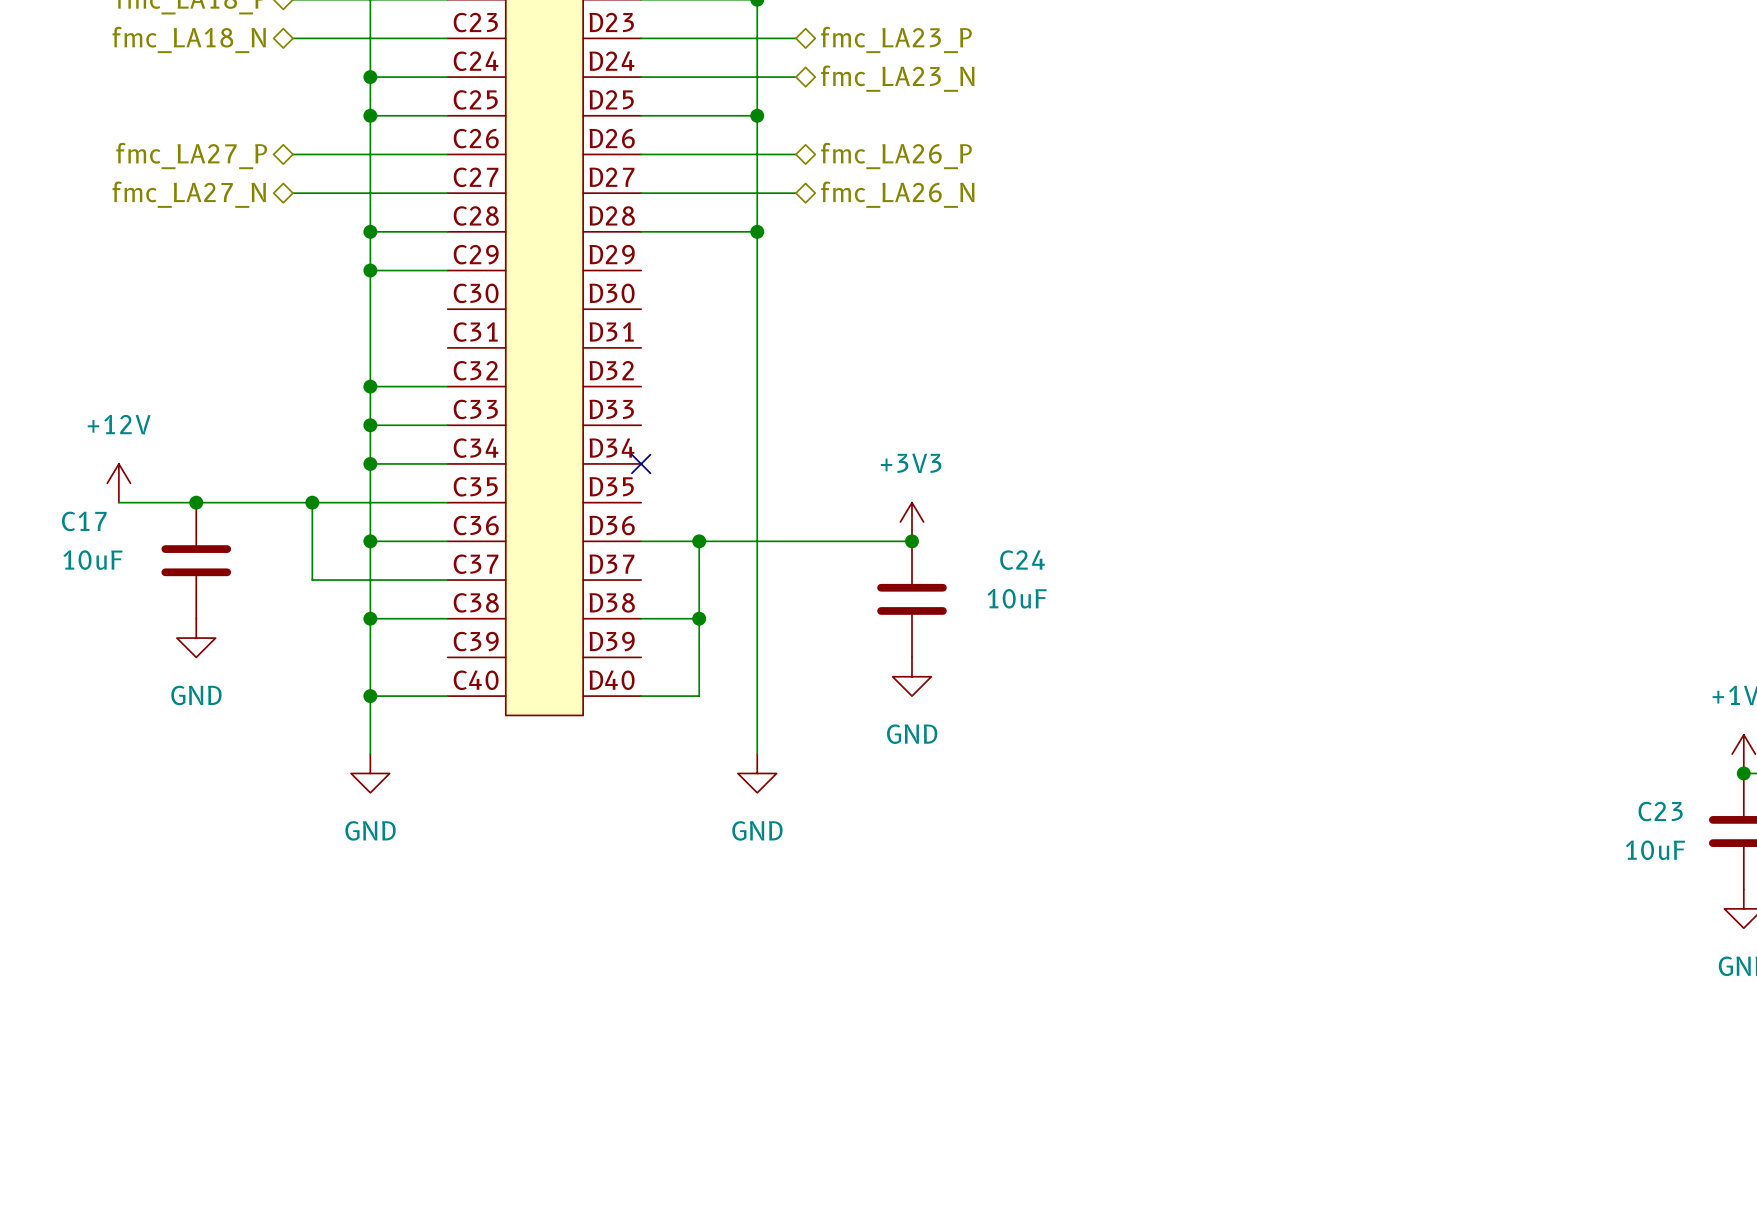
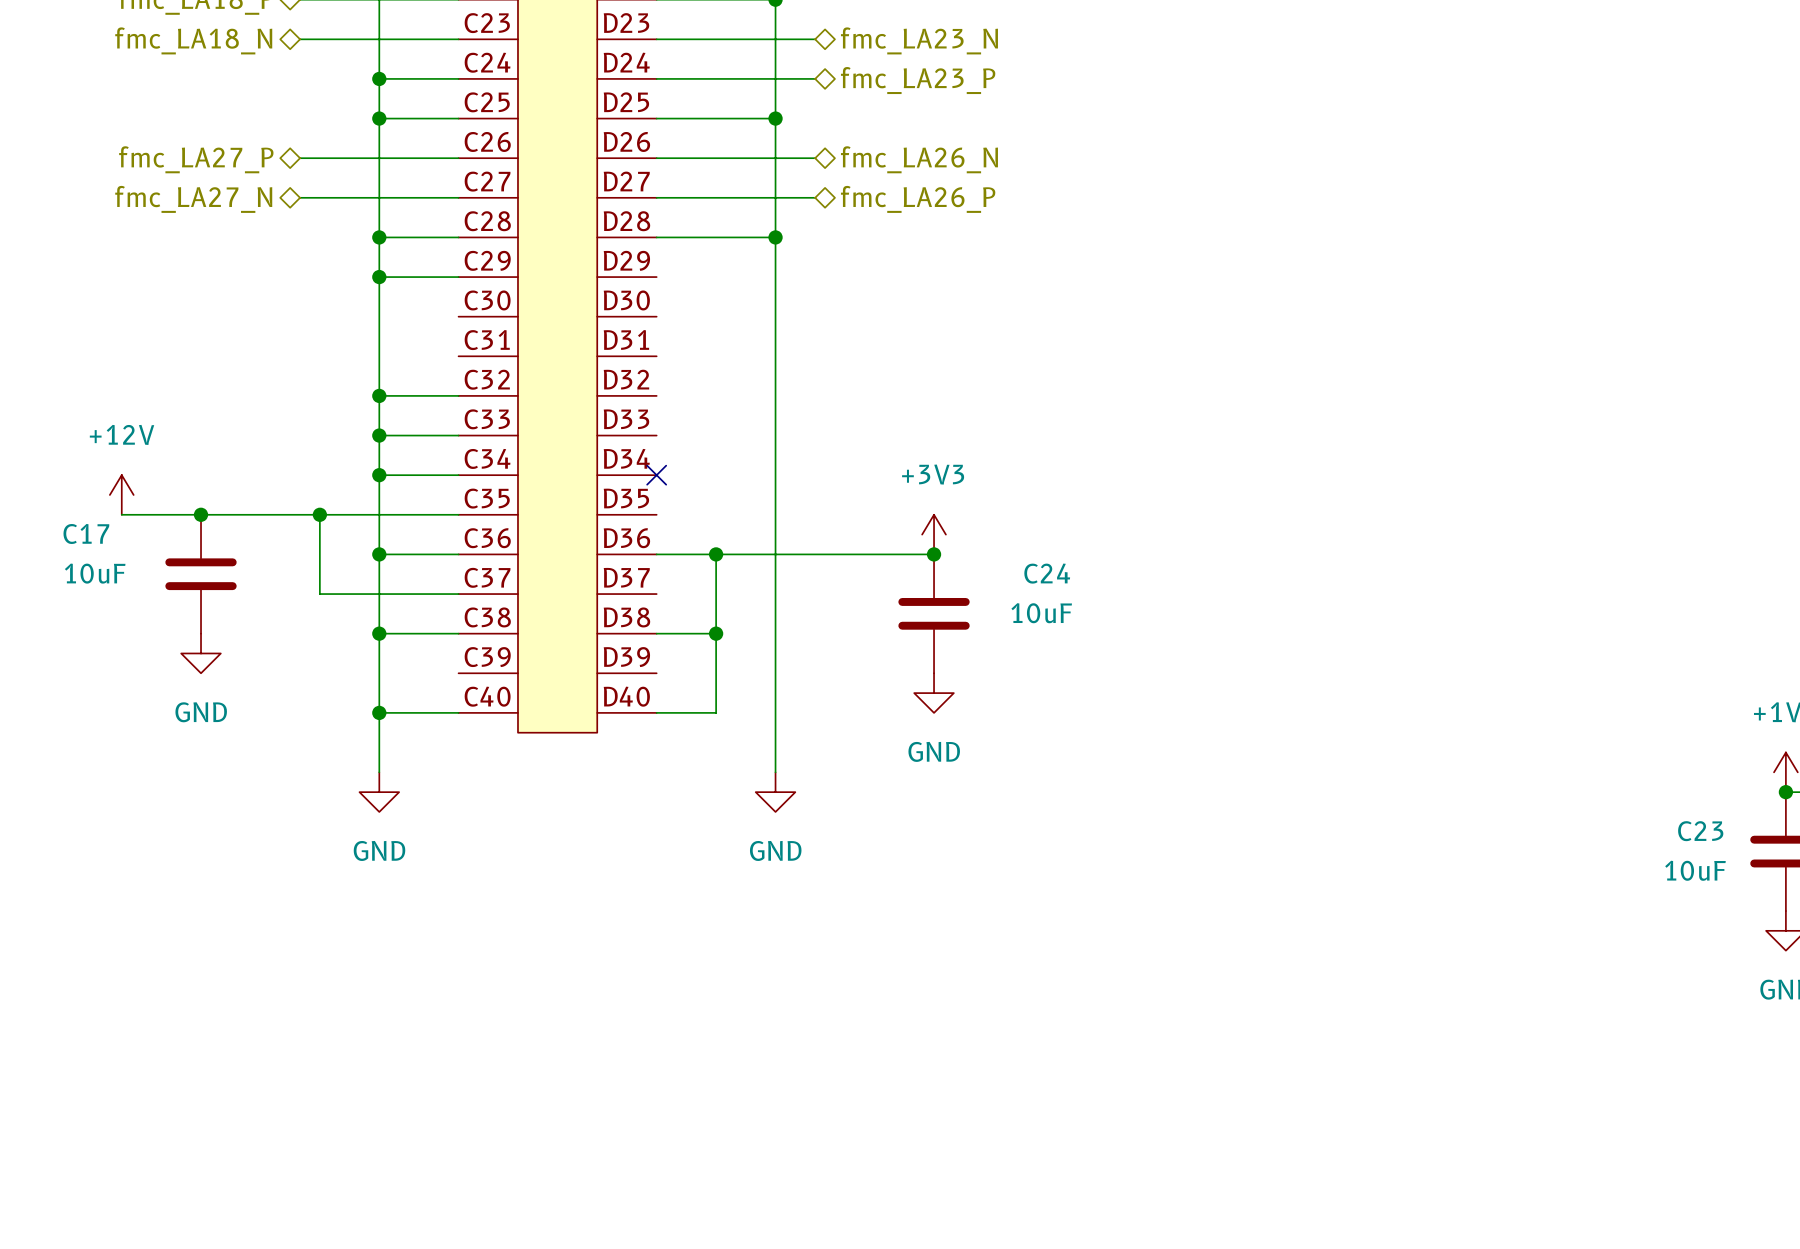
hierarchical label: fmc_LA23_P (896, 39) -> fmc_LA23_N (919, 40)
hierarchical label: fmc_LA23_N (897, 78) -> fmc_LA23_P (918, 80)
hierarchical label: fmc_LA26_P (896, 156) -> fmc_LA26_N (919, 159)
hierarchical label: fmc_LA26_N (897, 194) -> fmc_LA26_P (918, 199)

